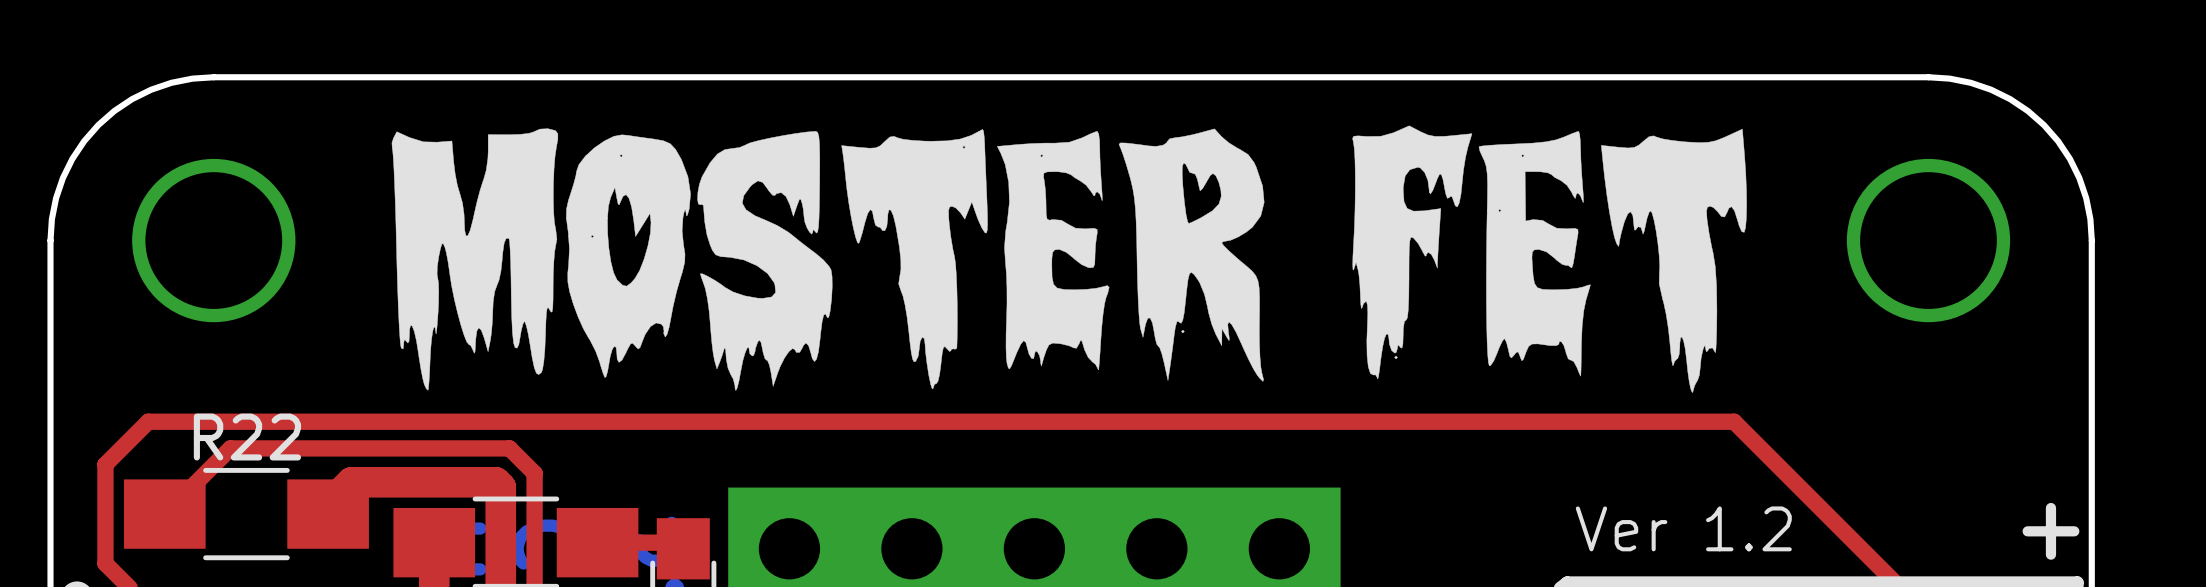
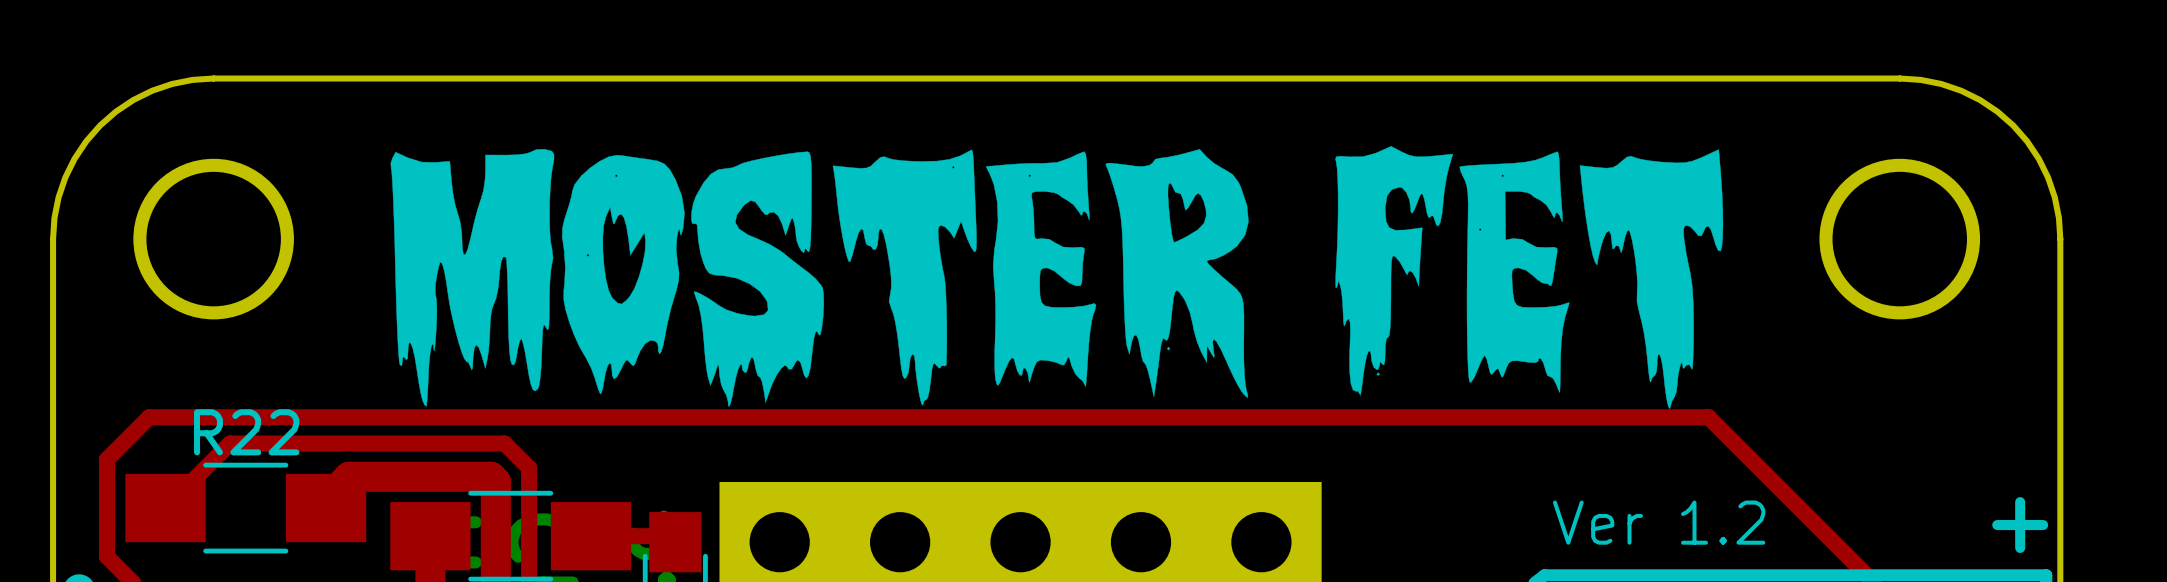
drawing position: (1069, 259) -> (1056, 277)

